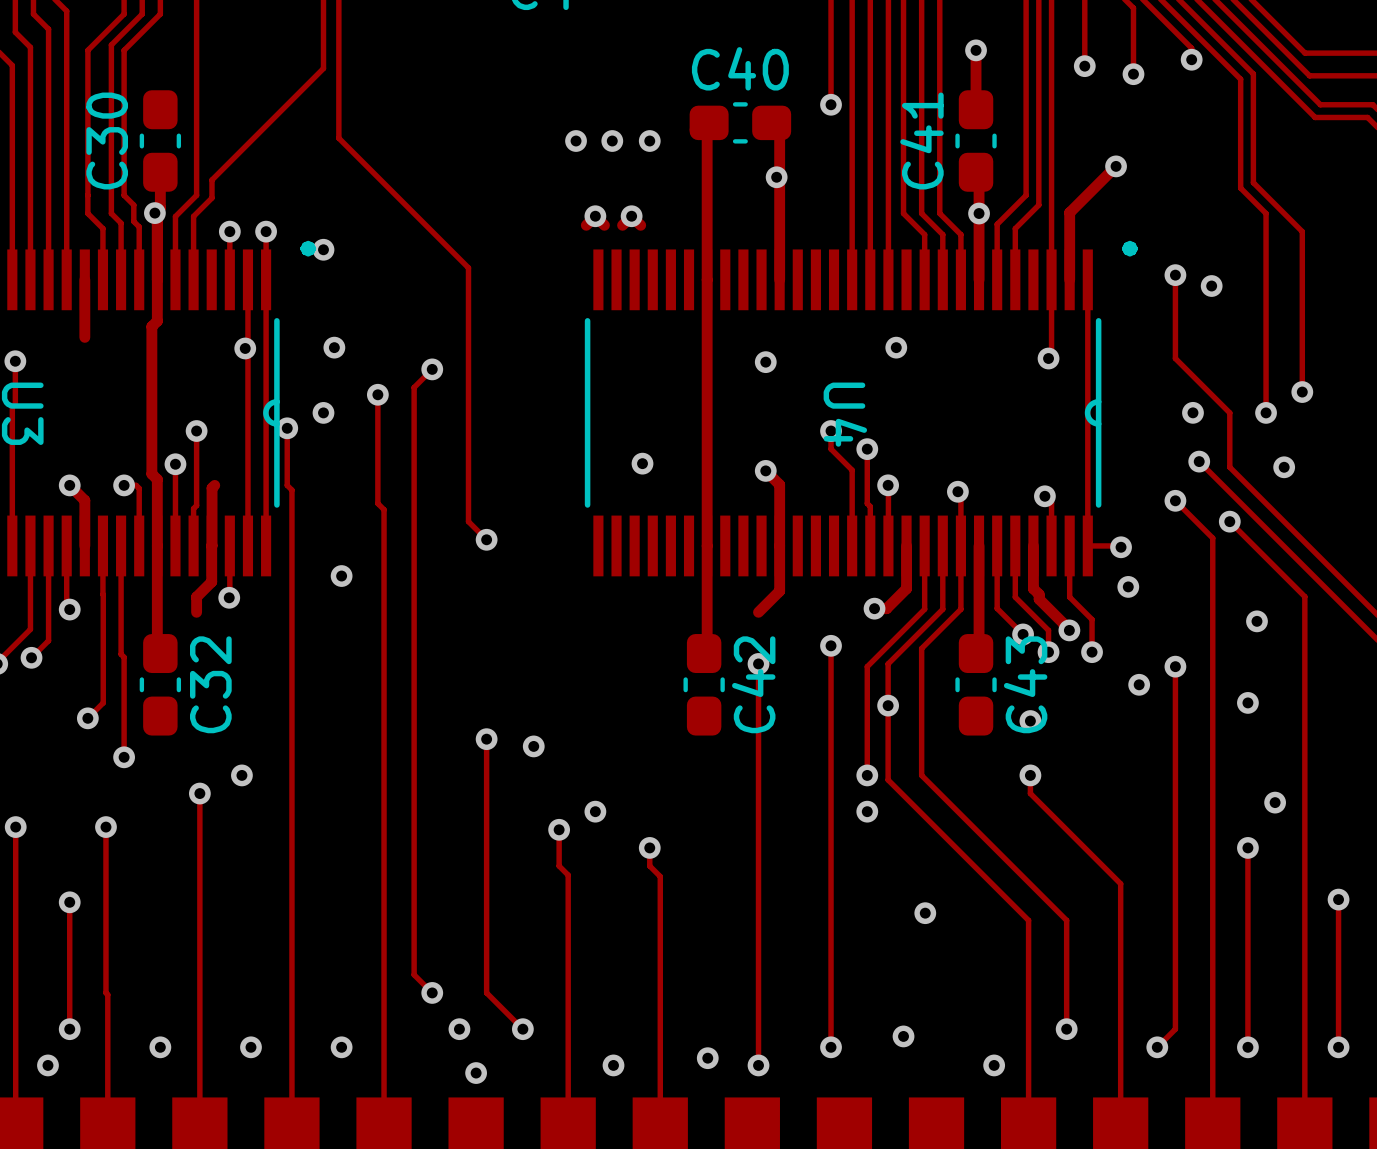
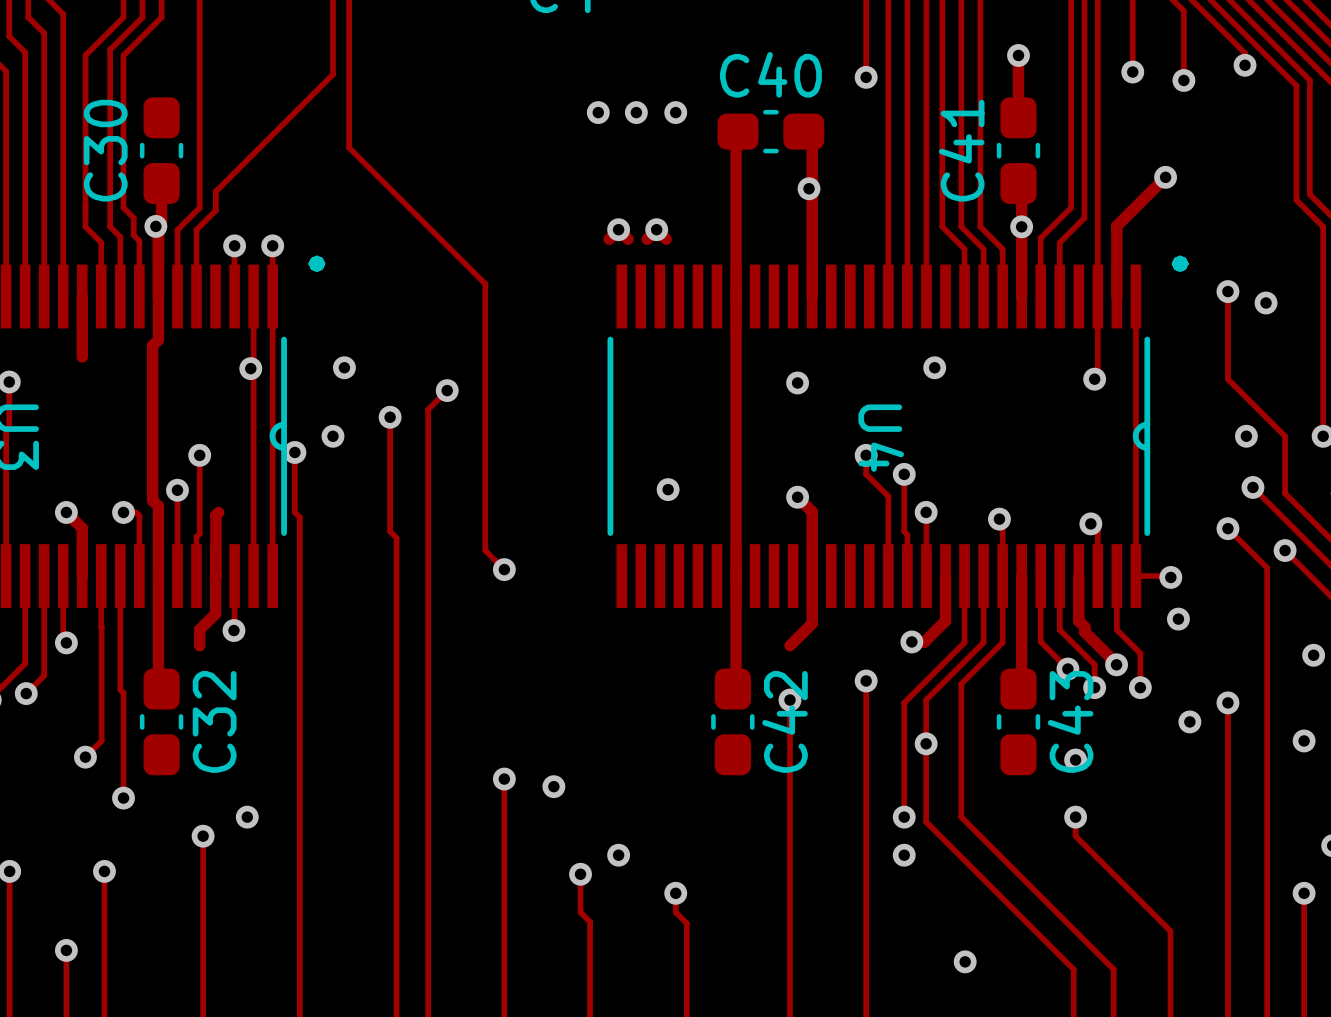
track: (831, 71) (831, 104) -> none
via: none -> (598, 112)
via: none -> (636, 112)
via: none -> (675, 112)
via position: (831, 104) -> (866, 77)
via: (576, 141) -> none
via: (612, 141) -> none
via: (649, 141) -> none
via: (323, 249) -> none
via: (341, 576) -> none

